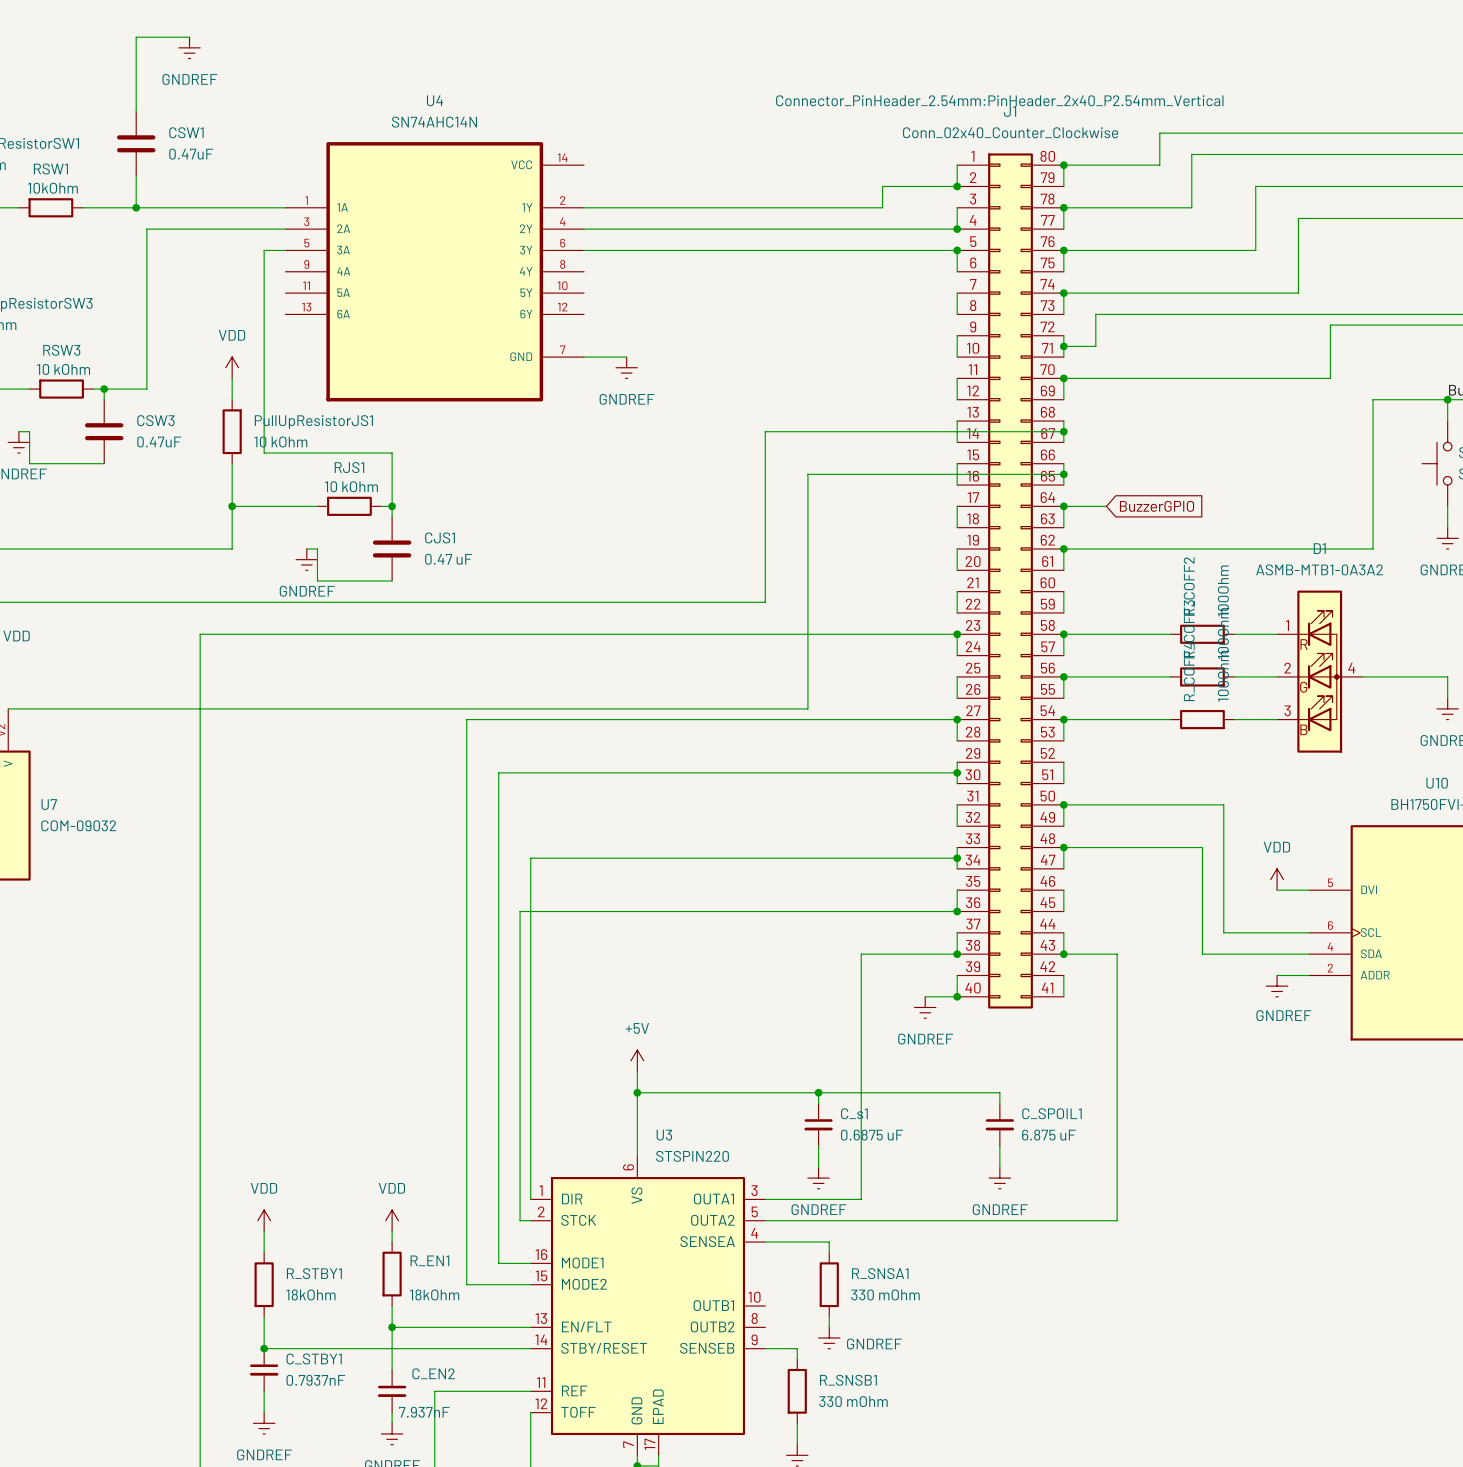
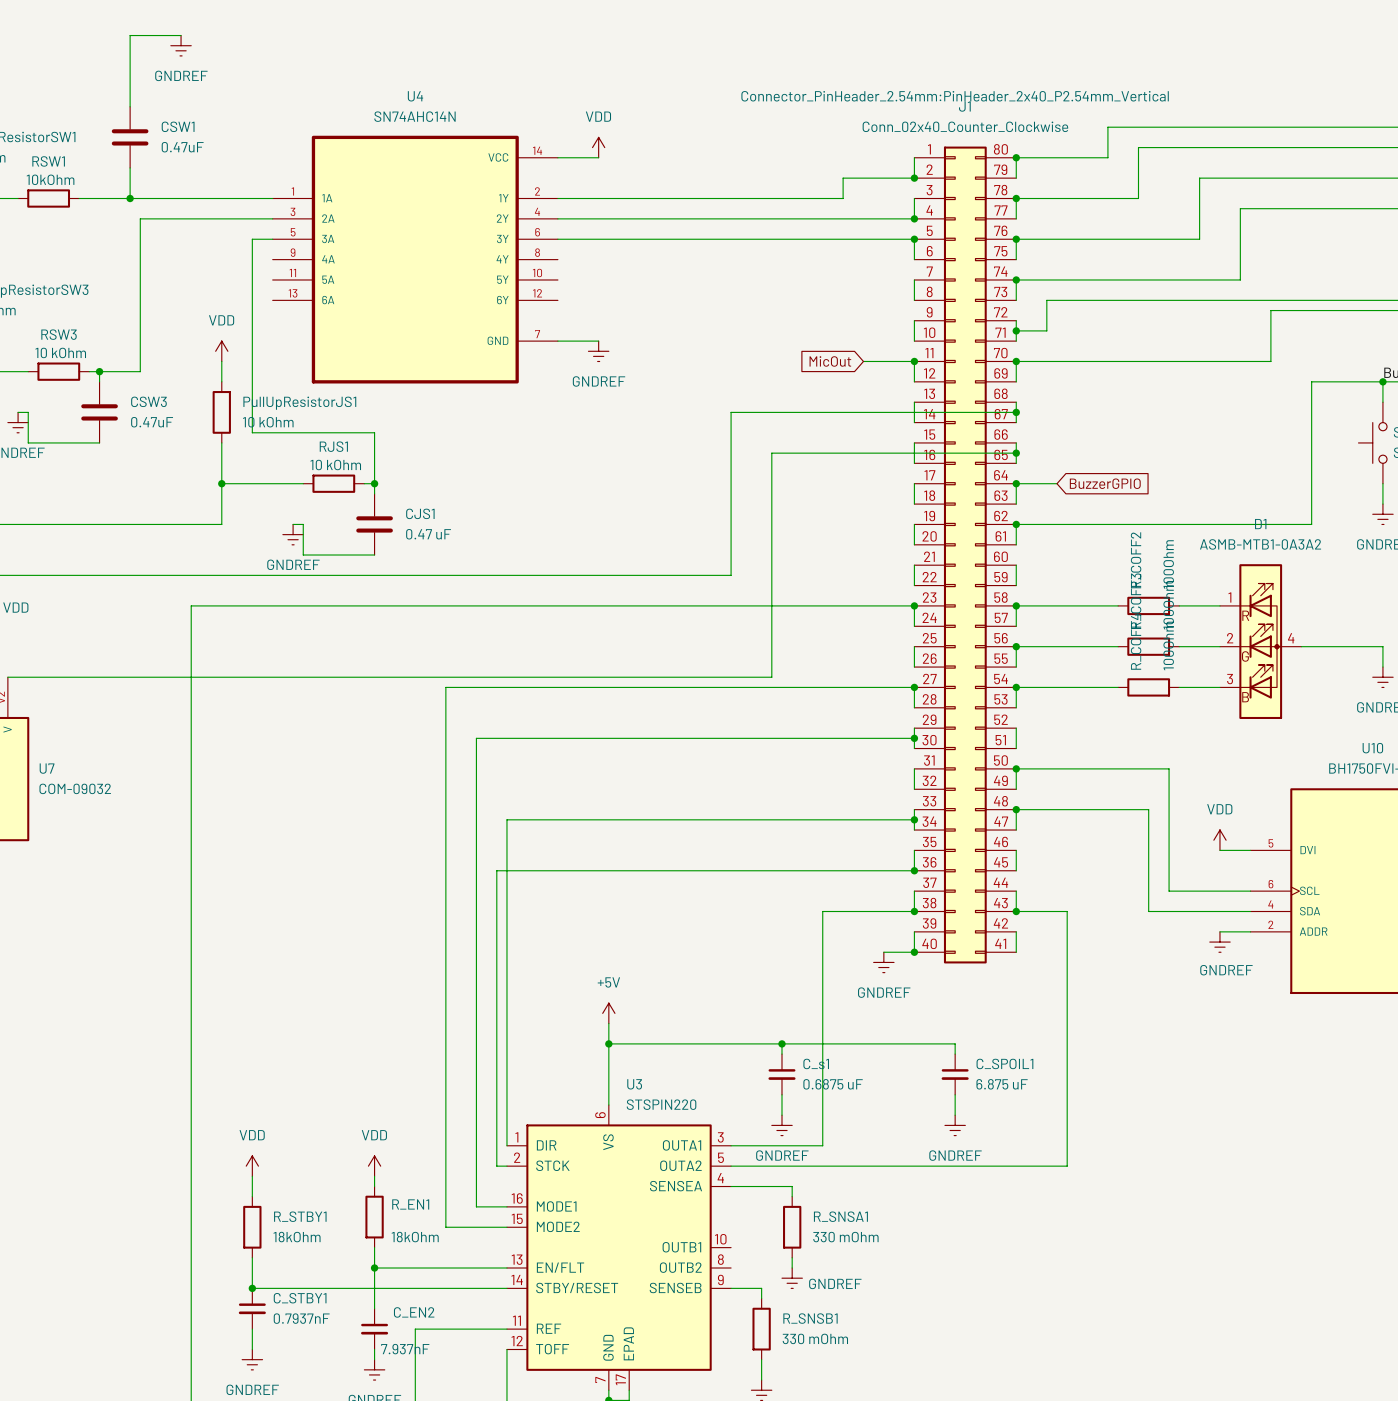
power symbol: none -> VDD (598, 147)
wire: none -> (557, 157) (598, 157)
global label: none -> MicOut (830, 361)
wire: none -> (863, 361) (914, 361)
junction: none -> (914, 361)

